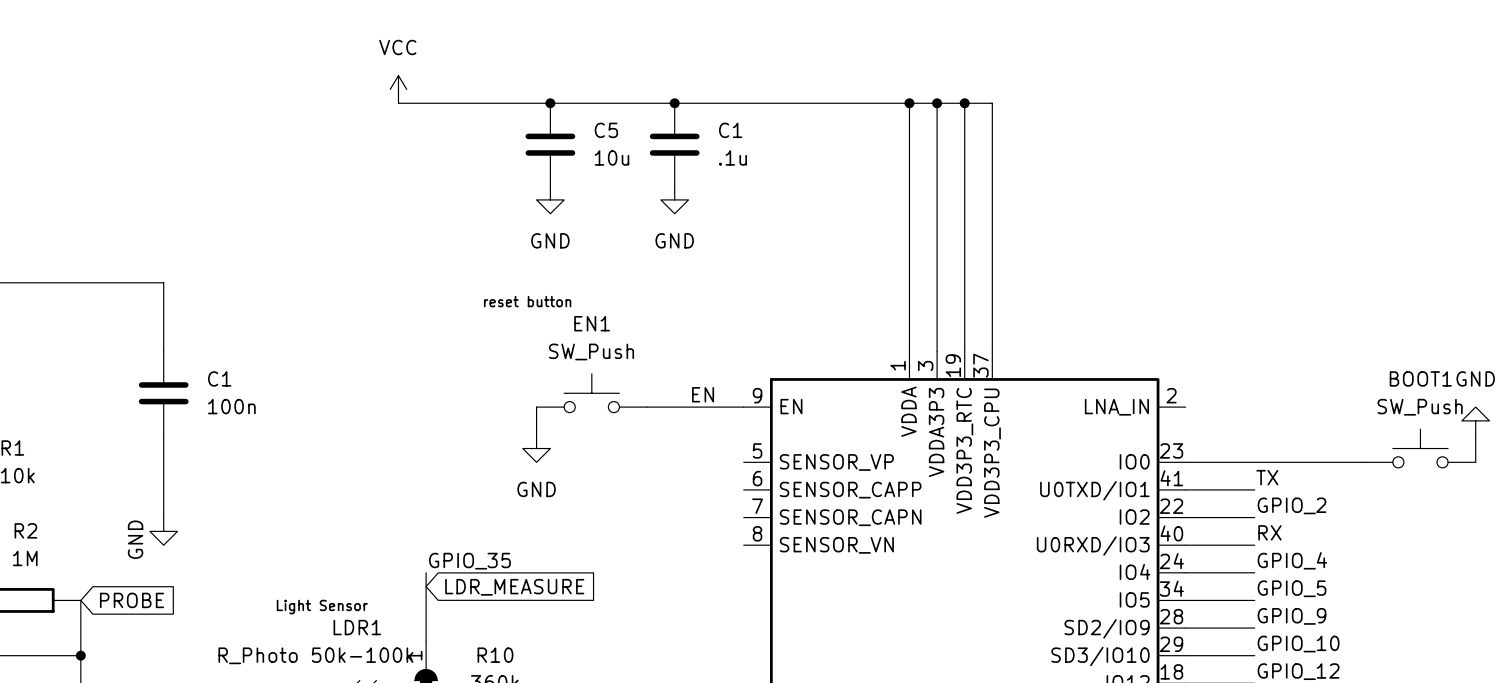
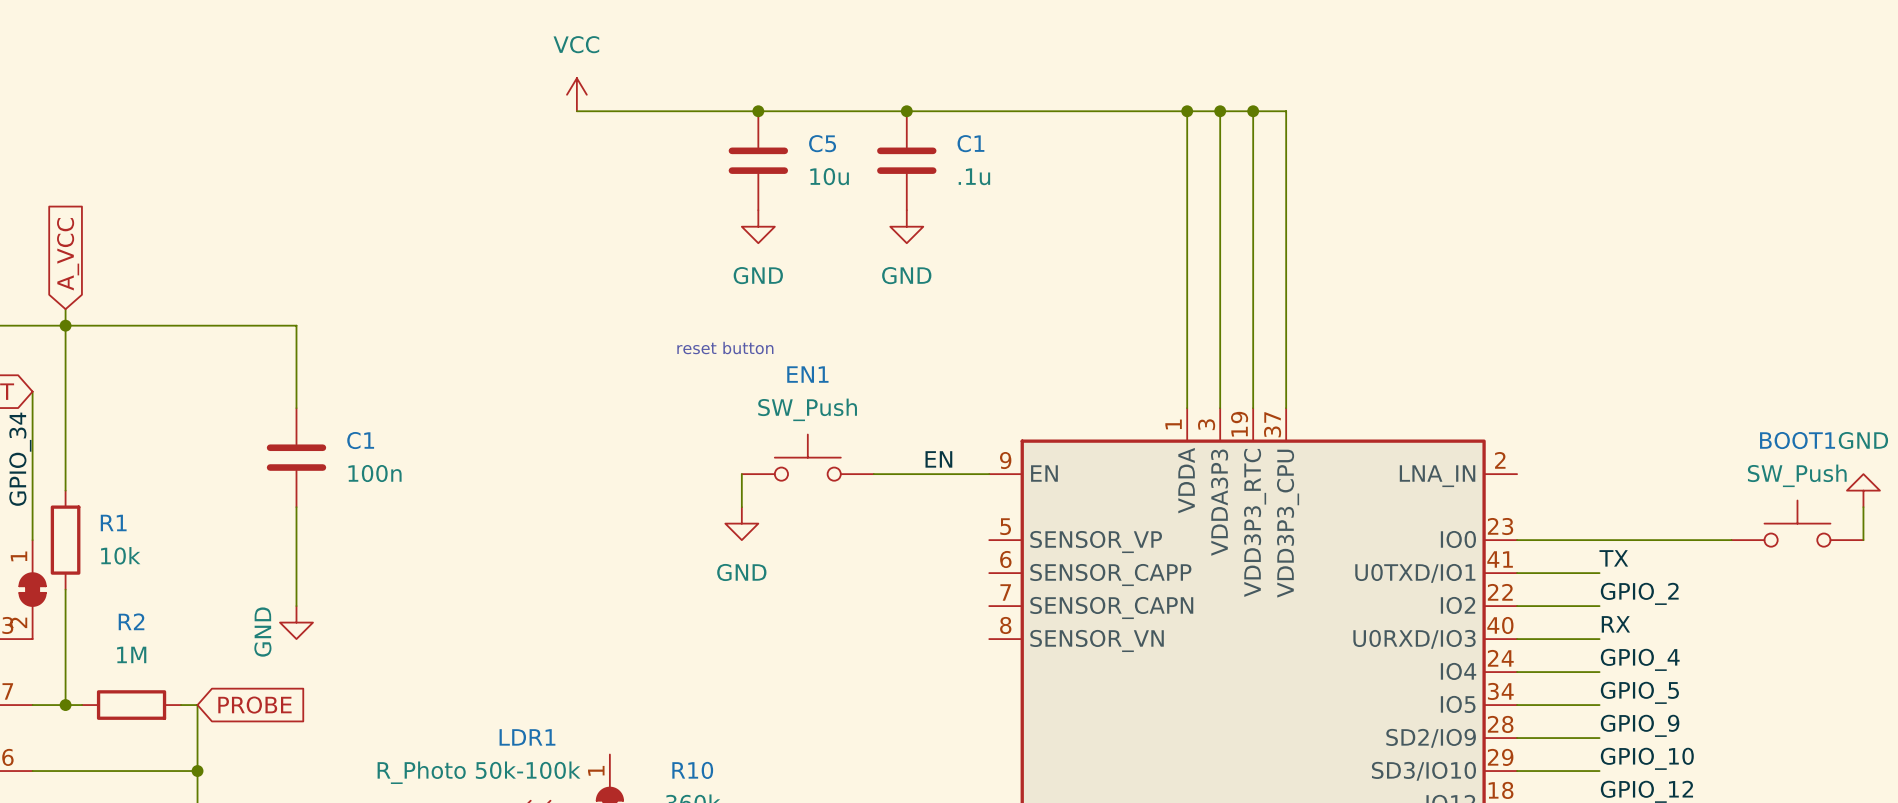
label: GPIO_35 (469, 561) -> none
wire: (426, 572) (426, 641) -> none
global label: LDR_MEASURE (514, 587) -> none
text: Light Sensor (322, 607) -> none

